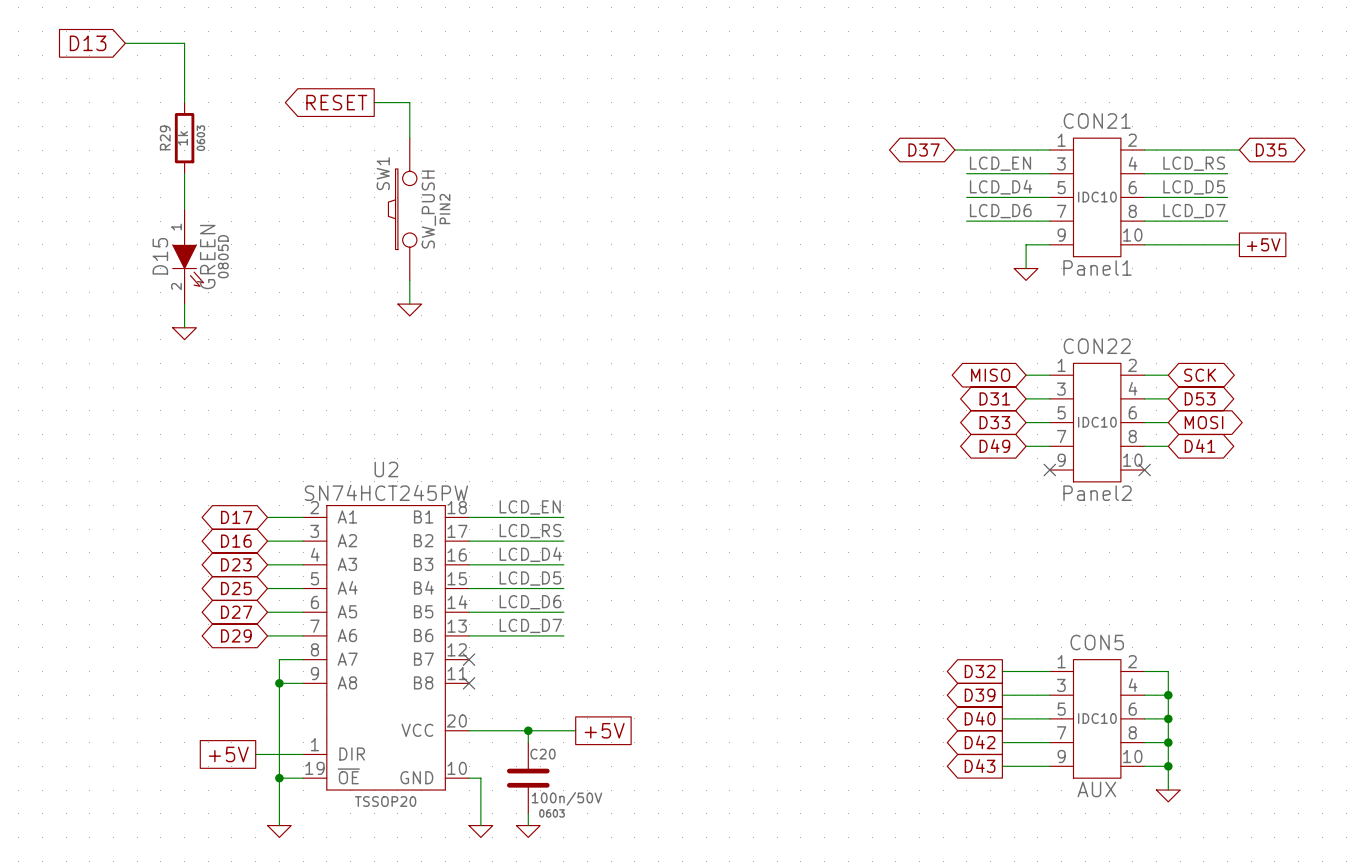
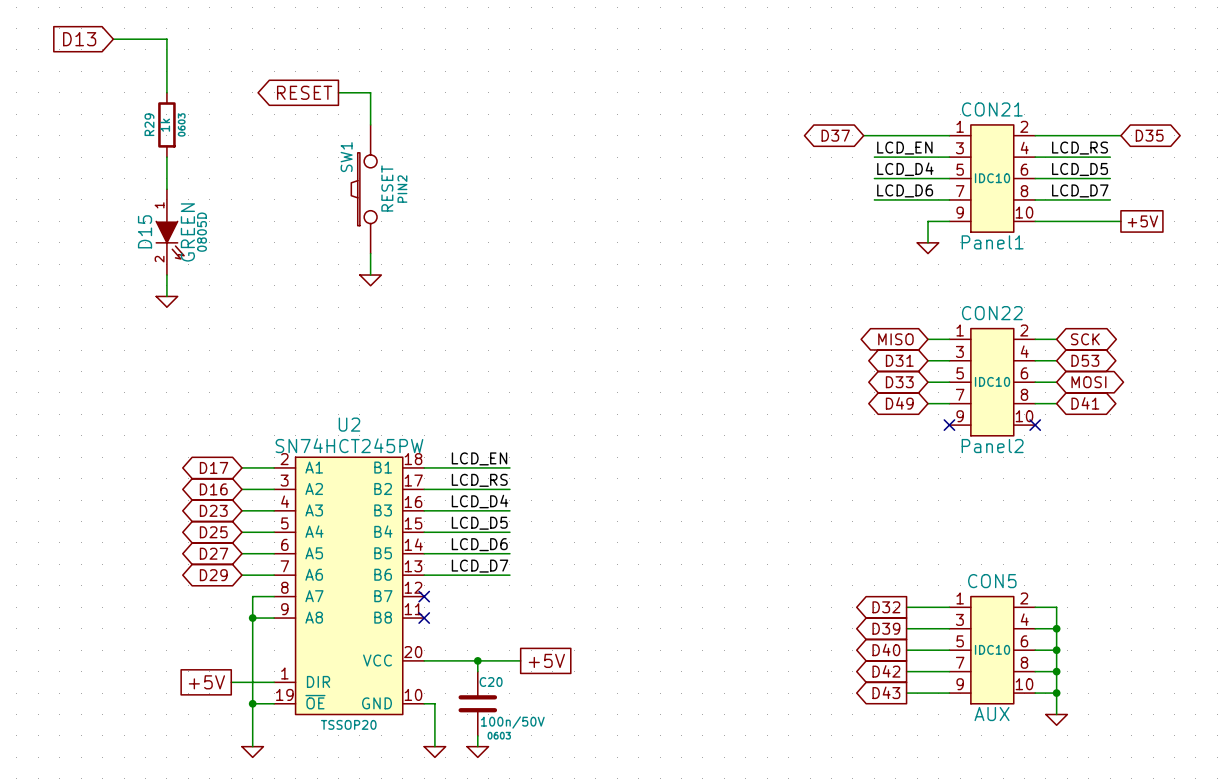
SW1 value: SW_PUSH (428, 209) -> RESET (387, 188)

